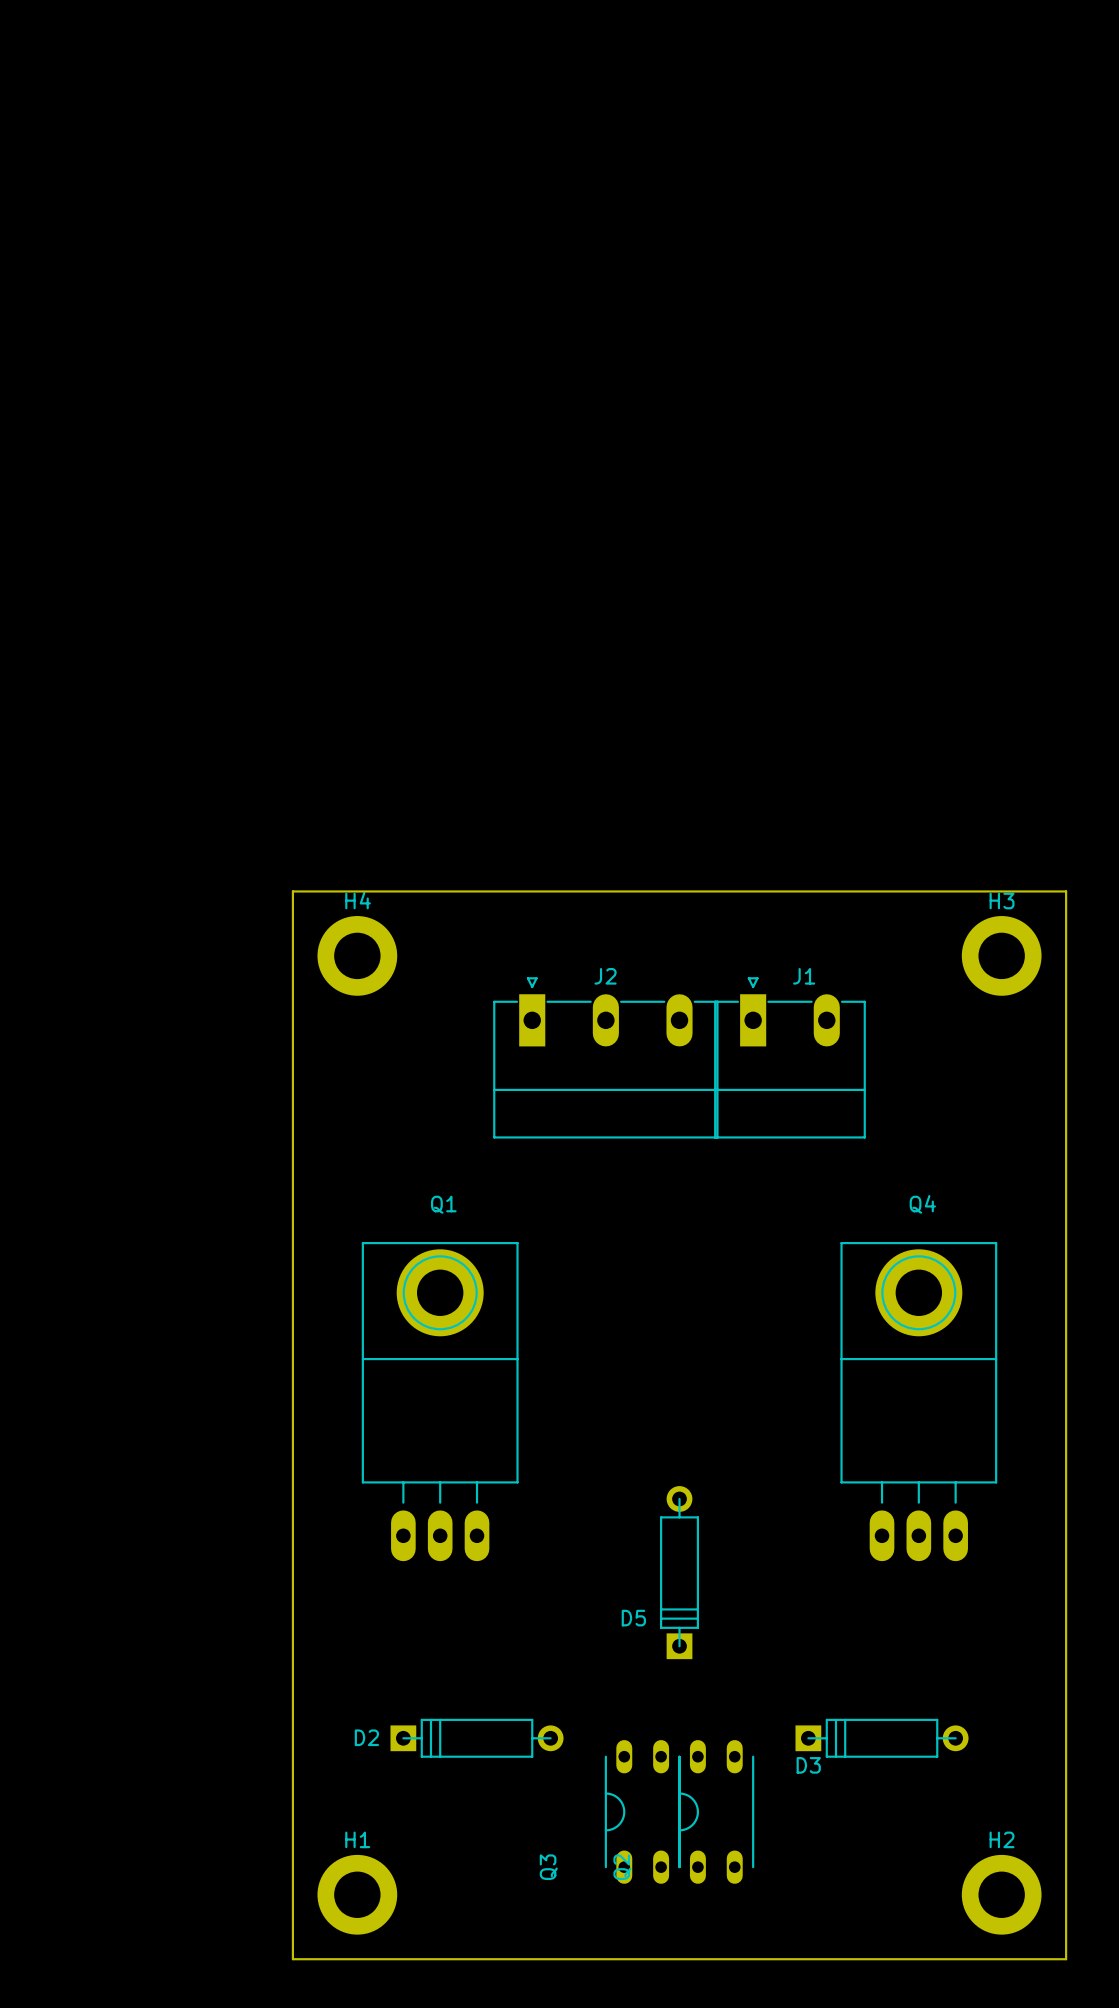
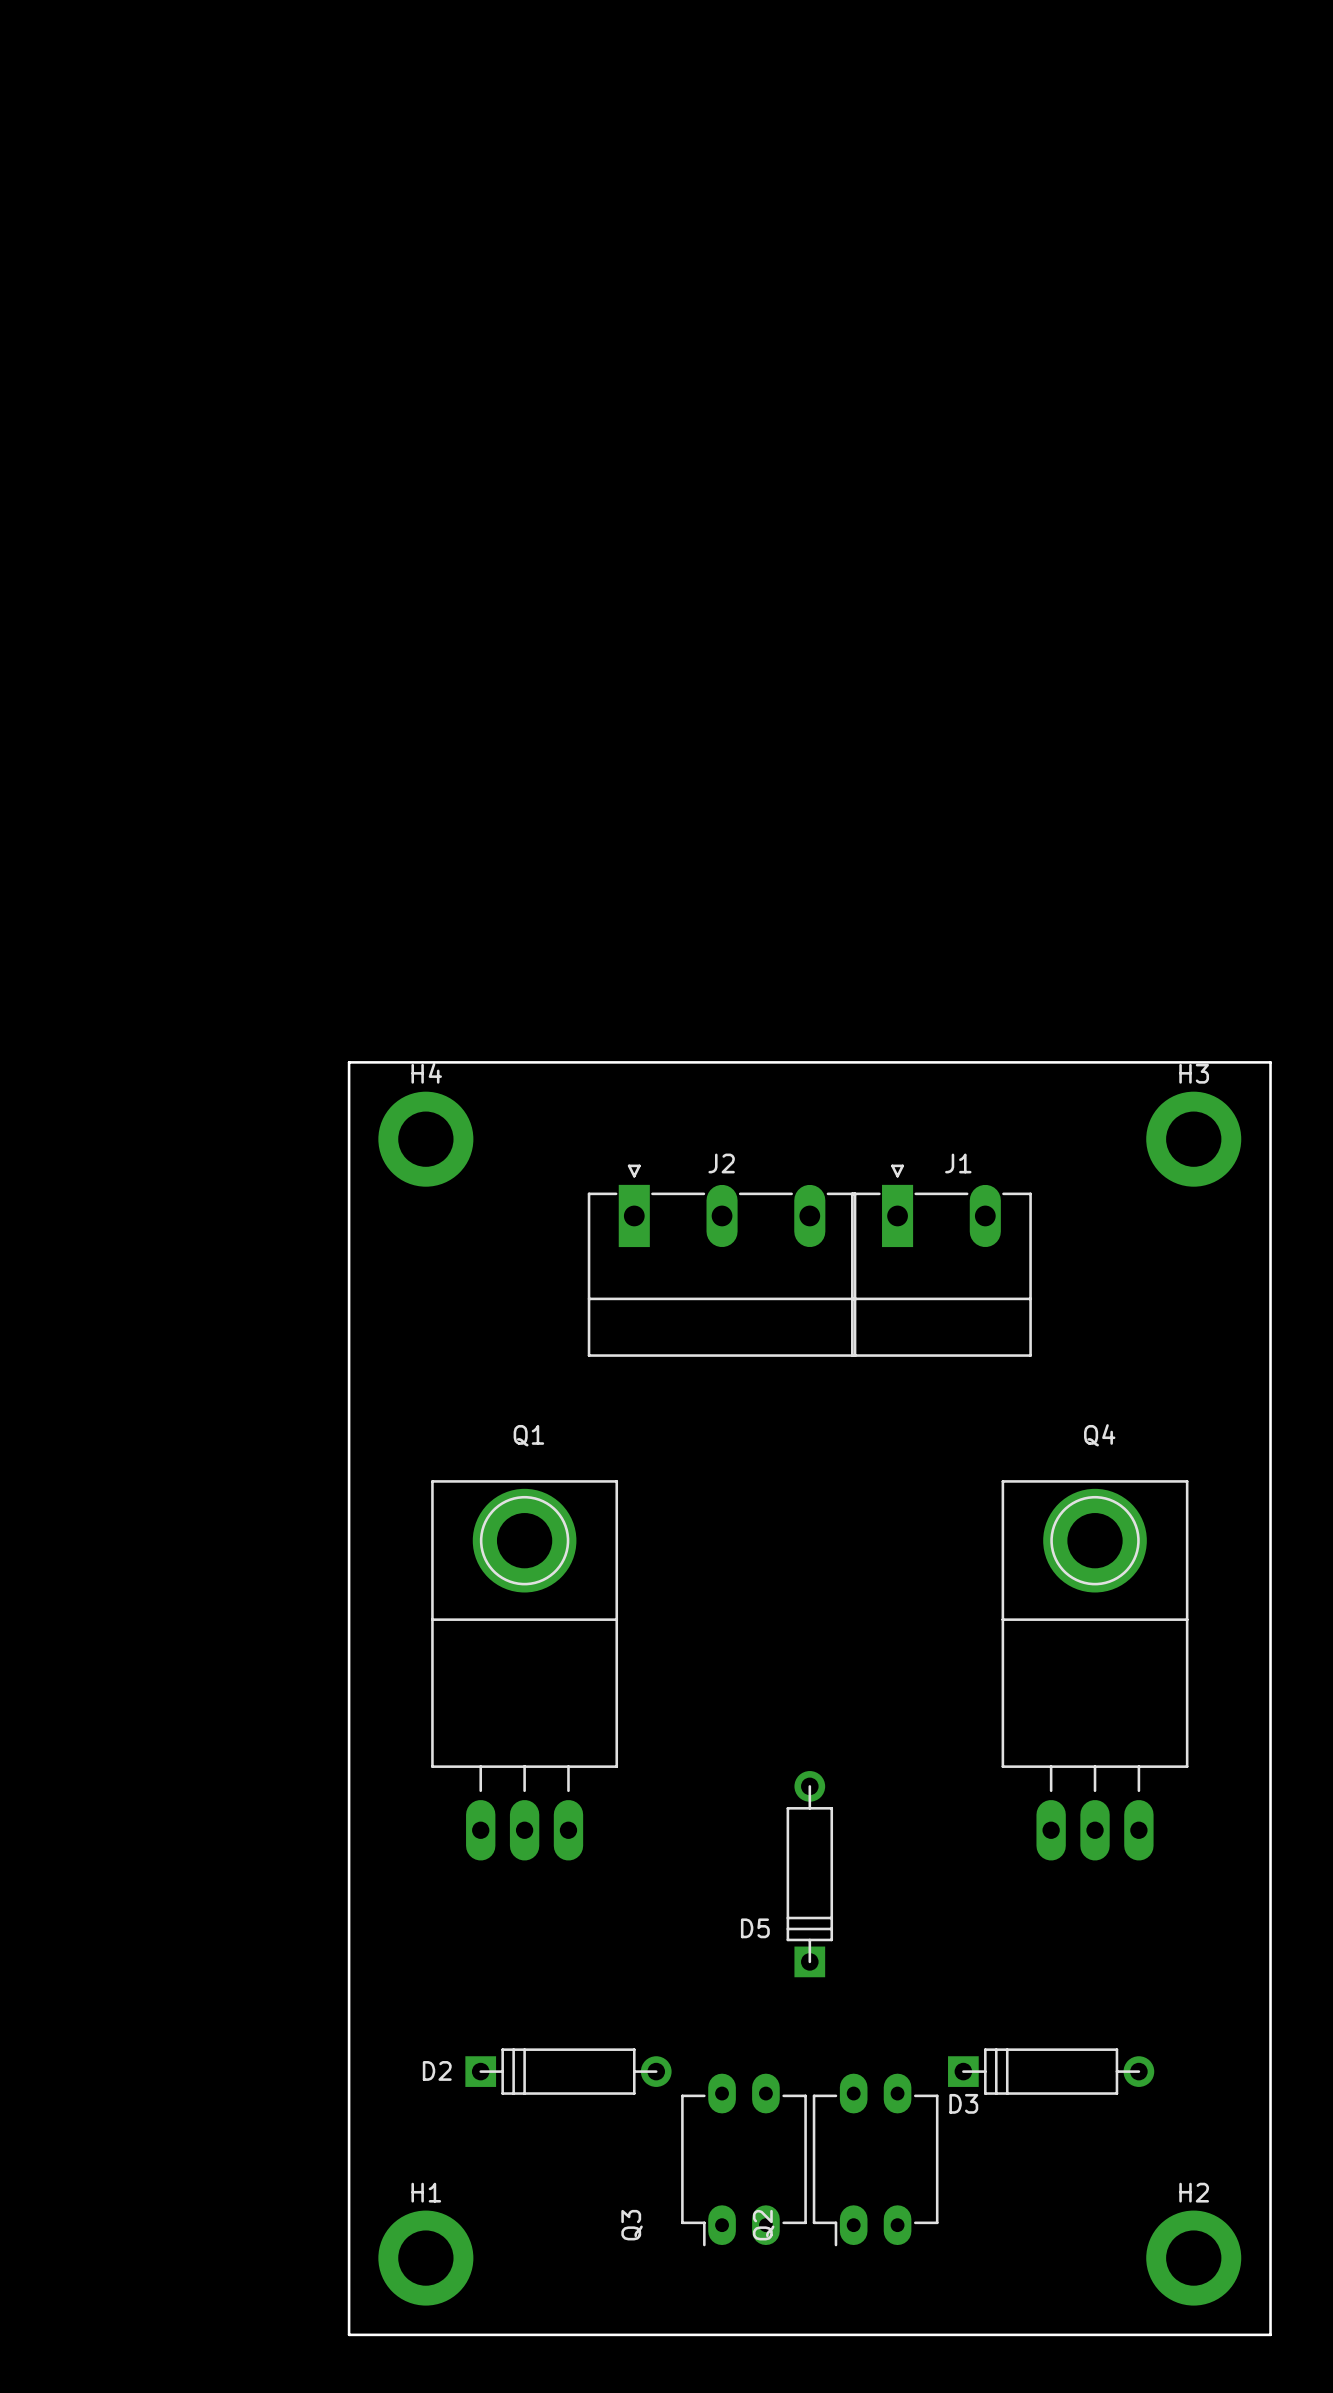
Q3 footprint: [604, 1740, 681, 1884] -> [681, 2073, 807, 2247]
Q2 footprint: [678, 1740, 755, 1884] -> [812, 2073, 939, 2247]

